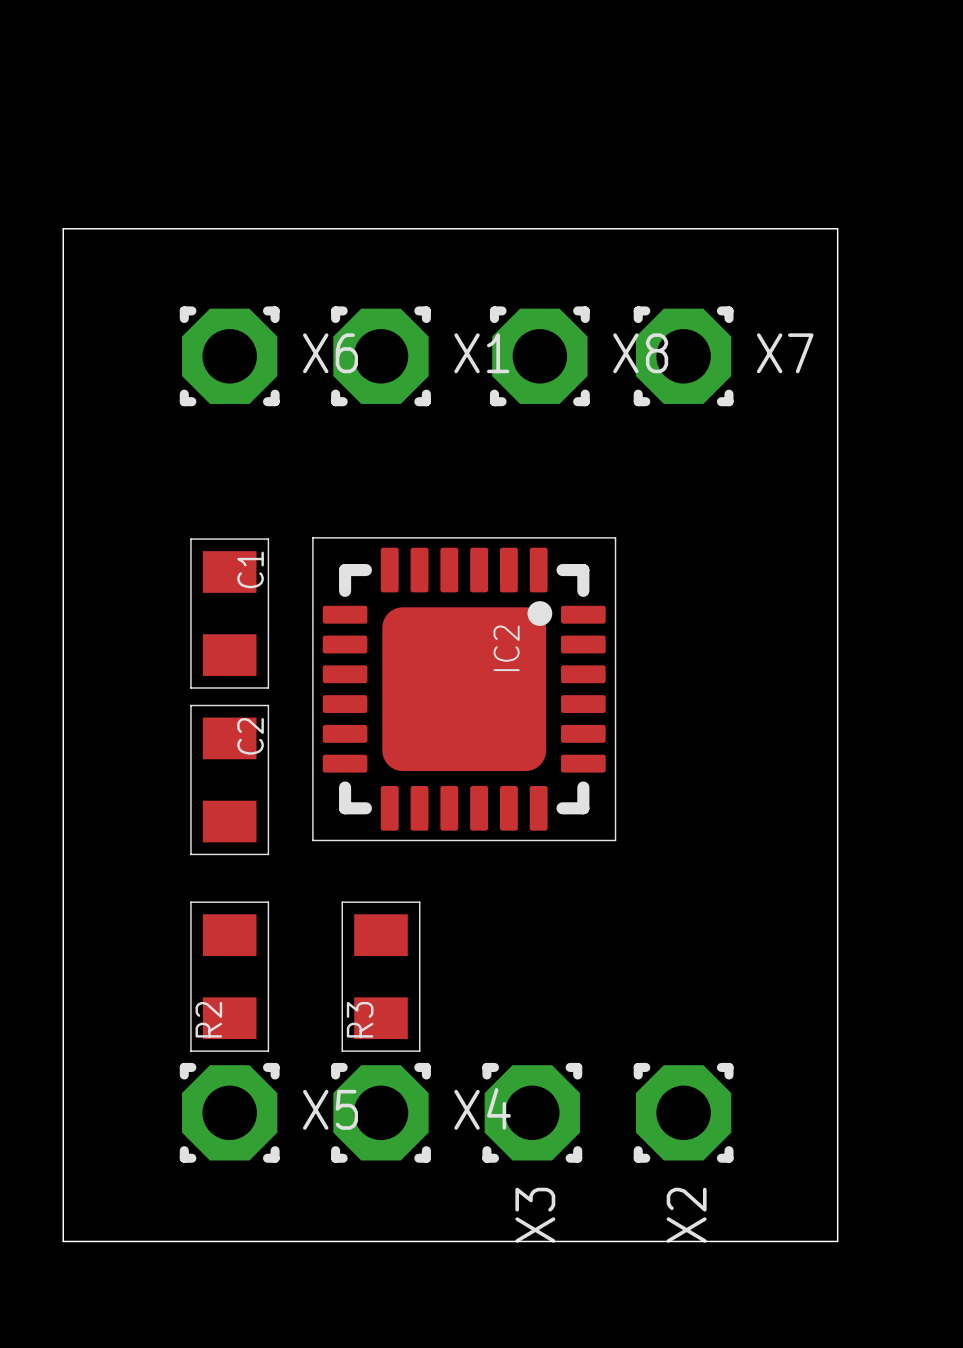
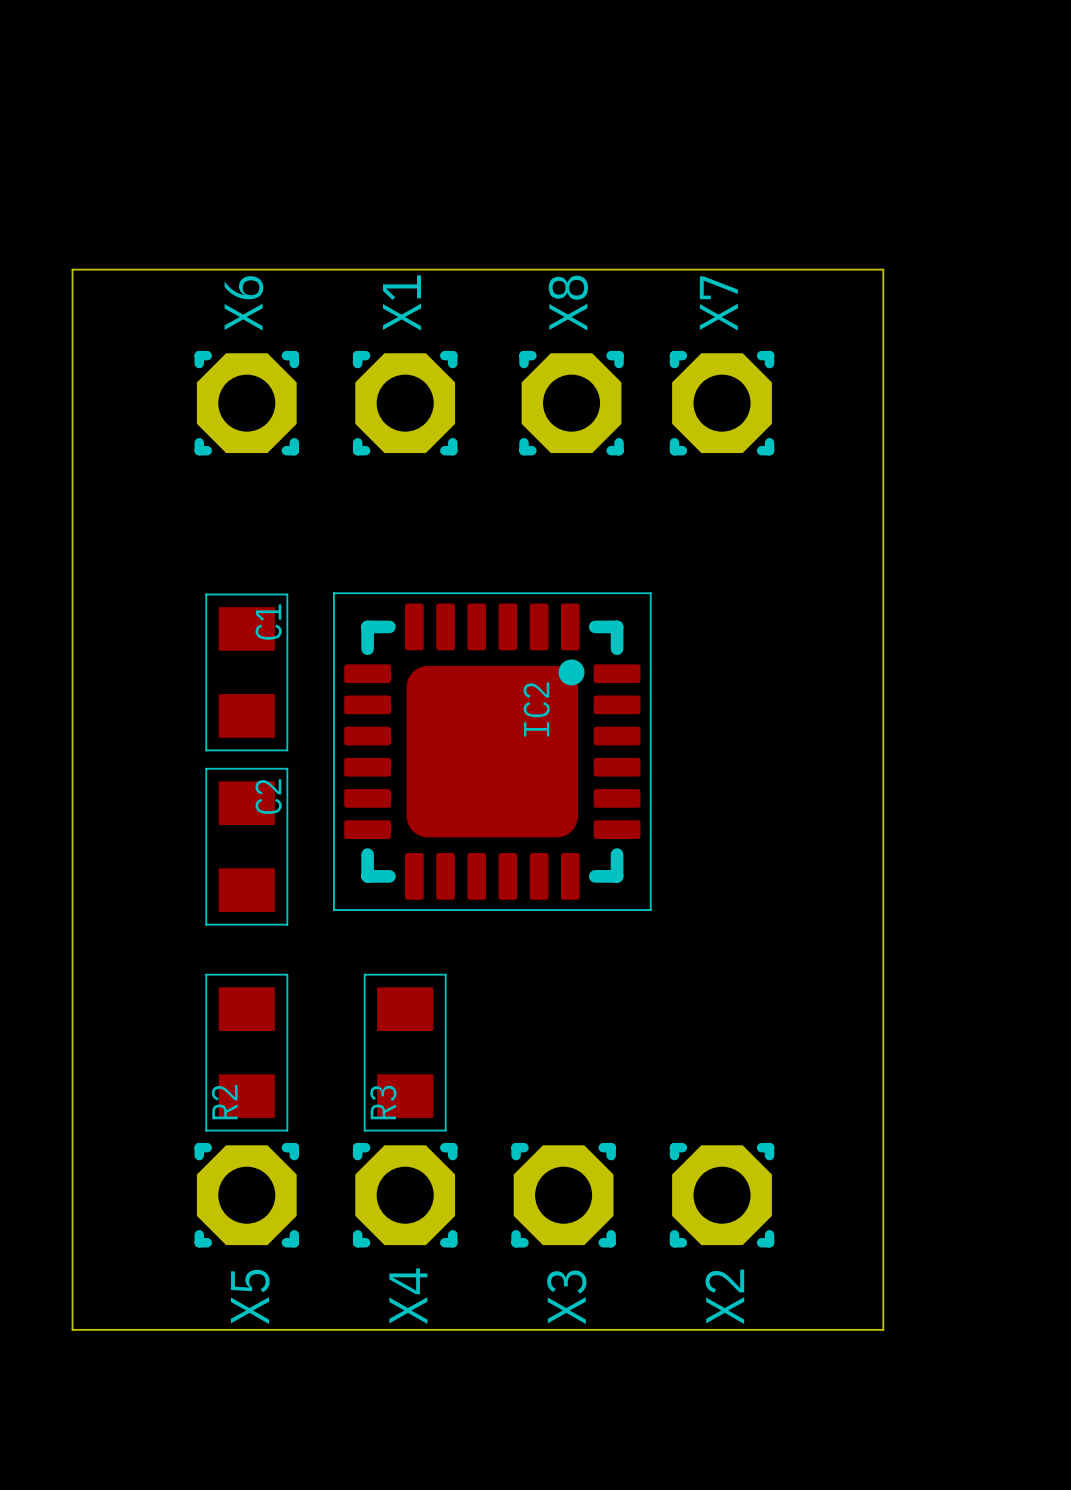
X6 name rotation: 0° (330, 353) -> 90° counterclockwise (243, 303)
X6 name position: X6 (330, 353) -> X6 (243, 303)
X1 name rotation: 0° (481, 353) -> 90° counterclockwise (402, 302)
X1 name position: X1 (481, 353) -> X1 (402, 302)
X8 name rotation: 0° (640, 353) -> 90° counterclockwise (568, 303)
X8 name position: X8 (640, 353) -> X8 (568, 303)
X7 name rotation: 0° (785, 353) -> 90° counterclockwise (718, 303)
X7 name position: X7 (785, 353) -> X7 (718, 303)
X4 name rotation: 0° (482, 1108) -> 90° counterclockwise (408, 1296)
X4 name position: X4 (482, 1108) -> X4 (408, 1296)
X5 name rotation: 0° (330, 1109) -> 90° counterclockwise (250, 1296)
X5 name position: X5 (330, 1109) -> X5 (250, 1296)

